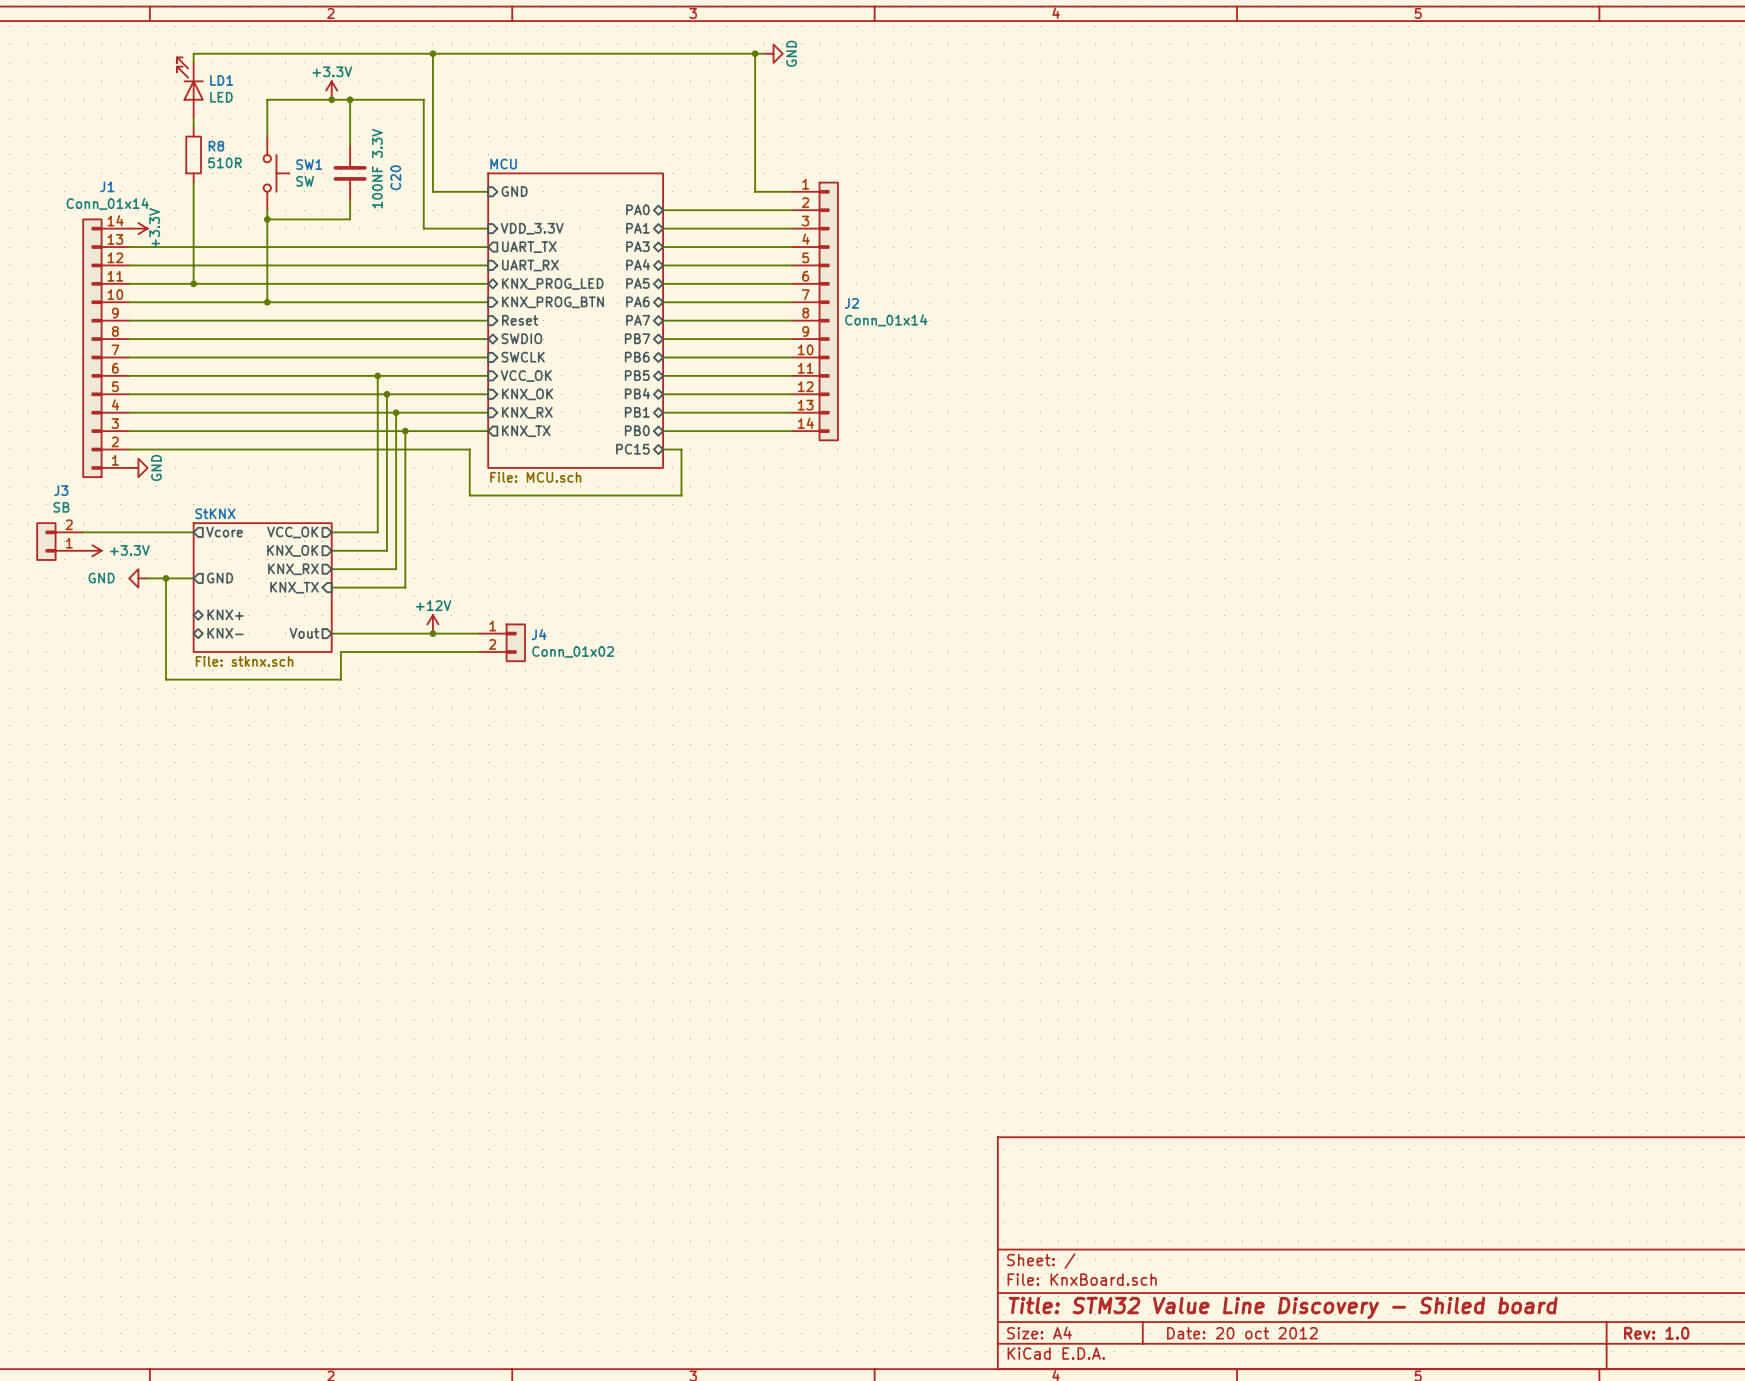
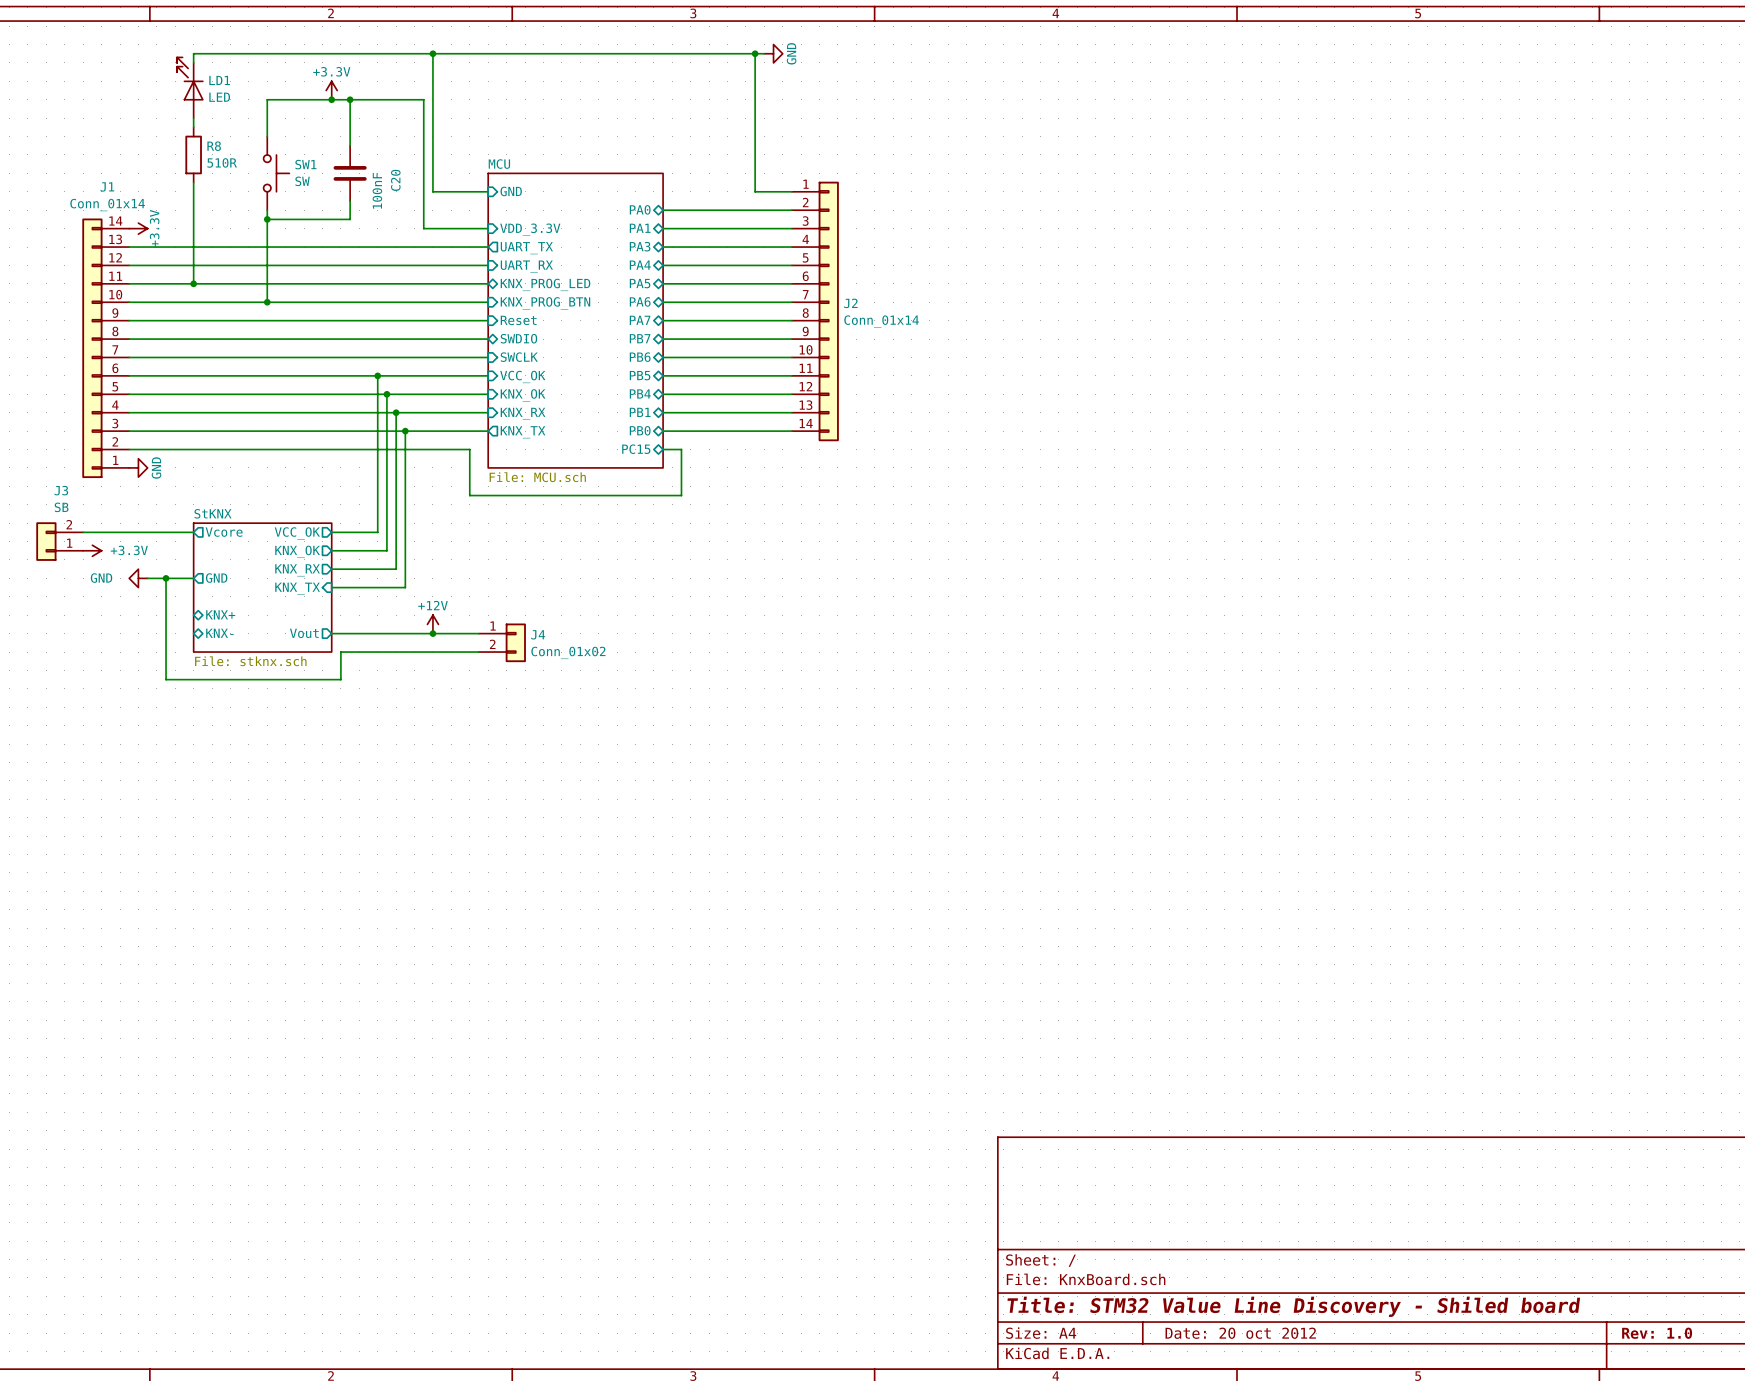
C20 value: 100NF 3.3V (377, 168) -> 100nF (377, 190)

